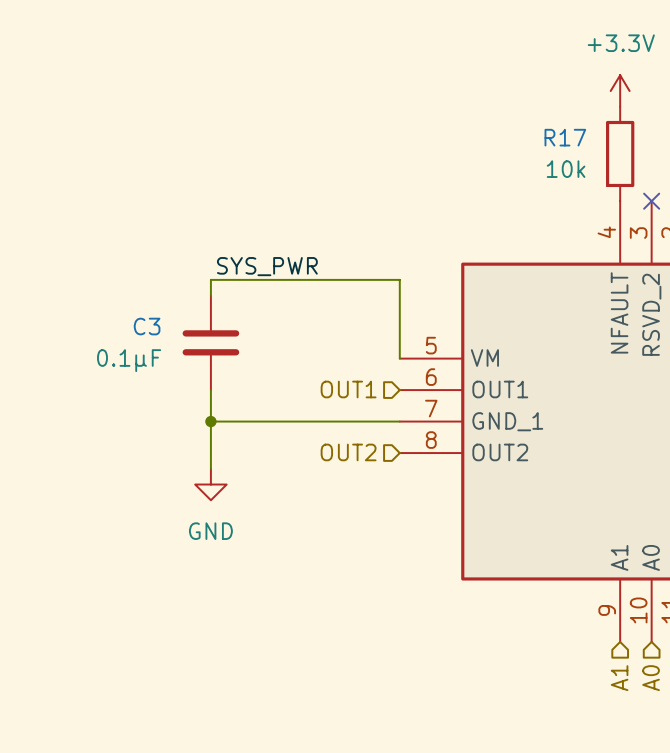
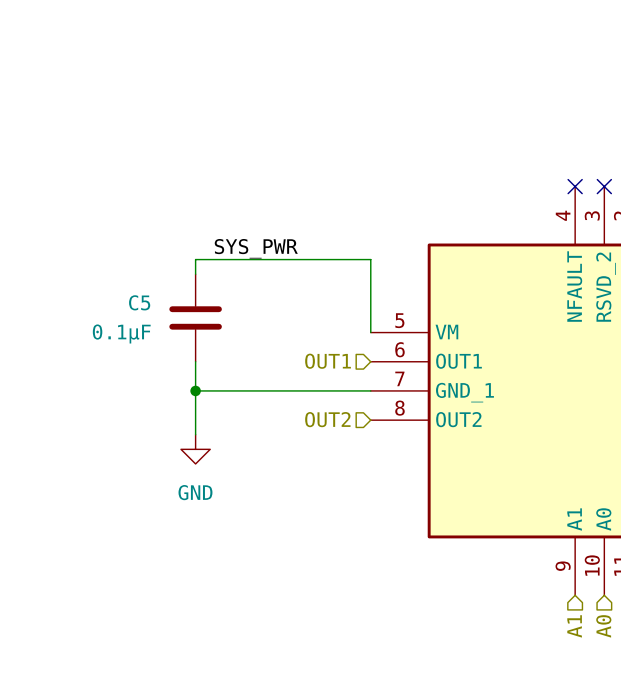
power symbol: +3.3V (620, 91) -> none
R17: 10k (620, 153) -> none
no-connect mark: none -> (575, 186)
C3 name: C3 (147, 326) -> C5 (139, 302)

